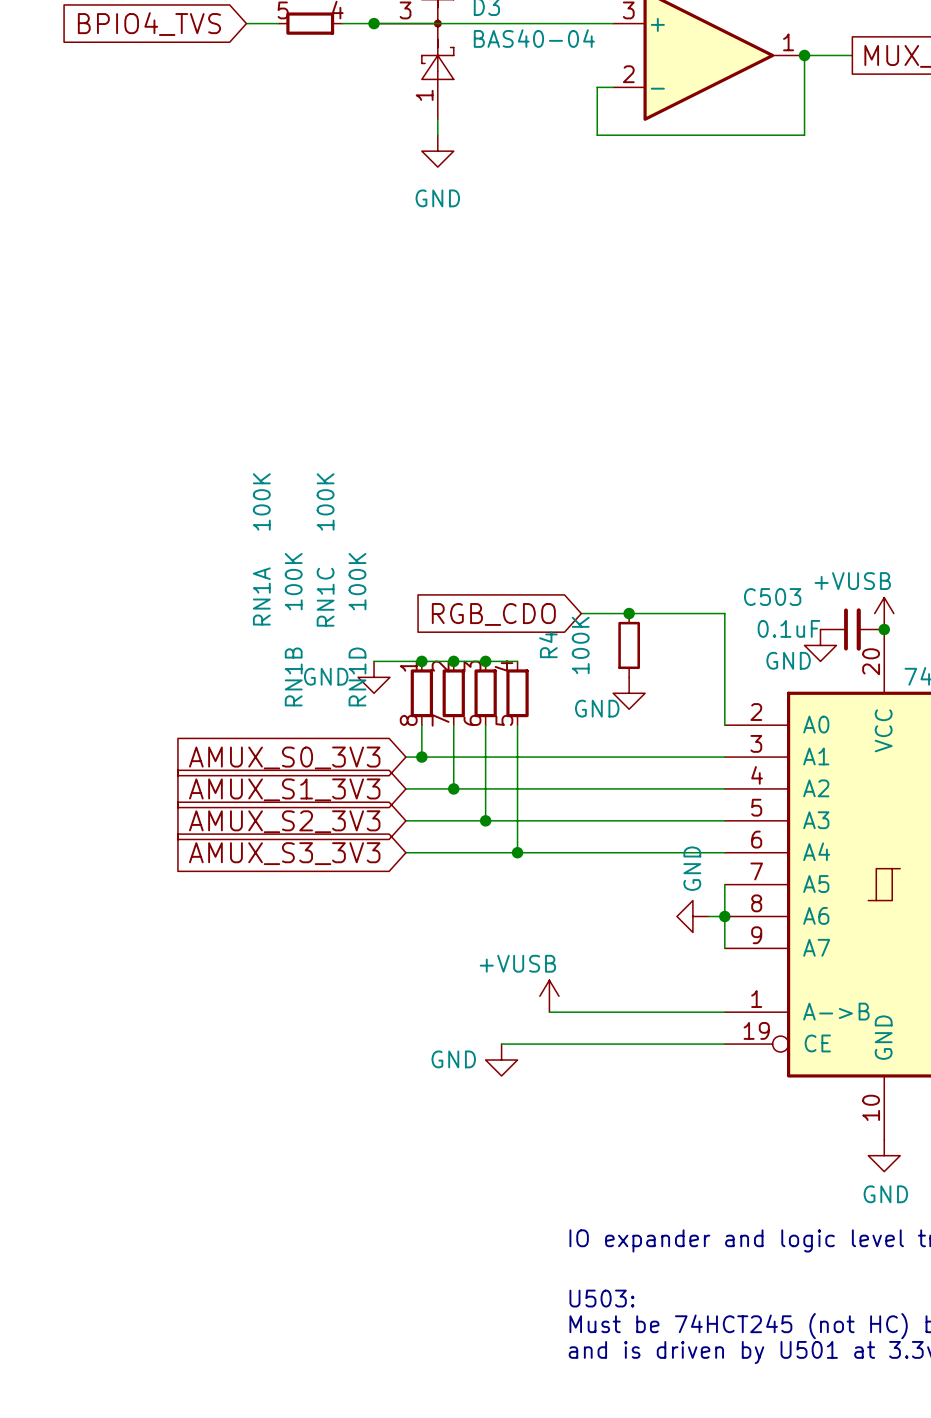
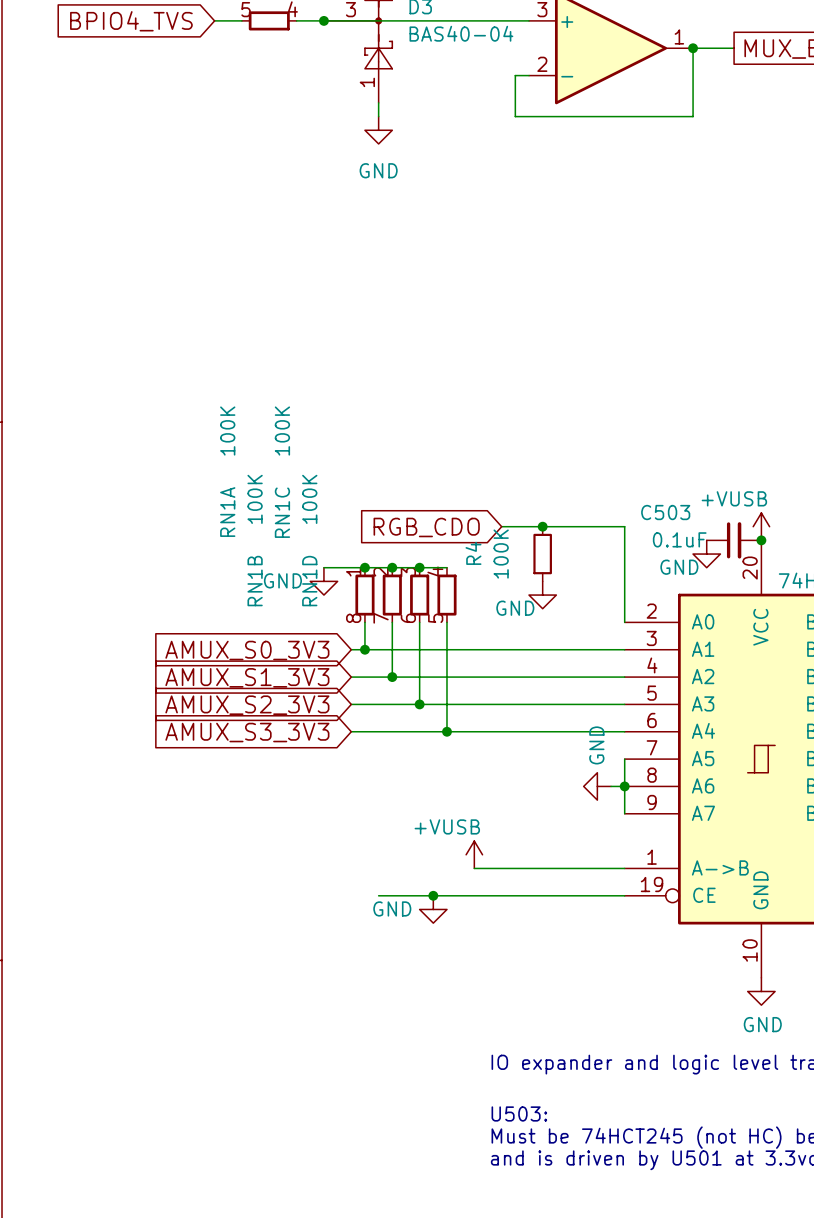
wire: none -> (378, 895) (433, 895)
junction: none -> (433, 895)

